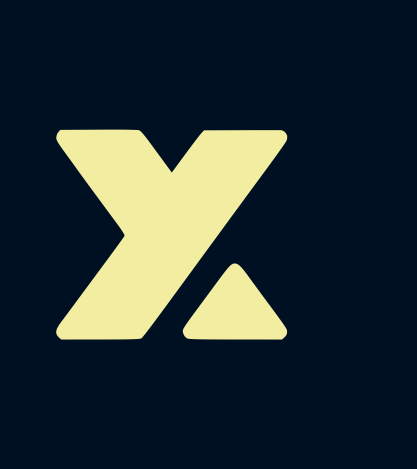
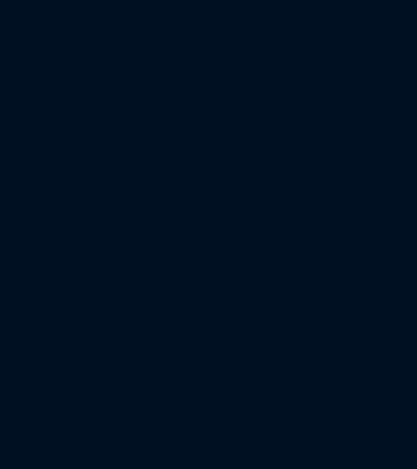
drawing: [56, 129, 288, 340] -> none

